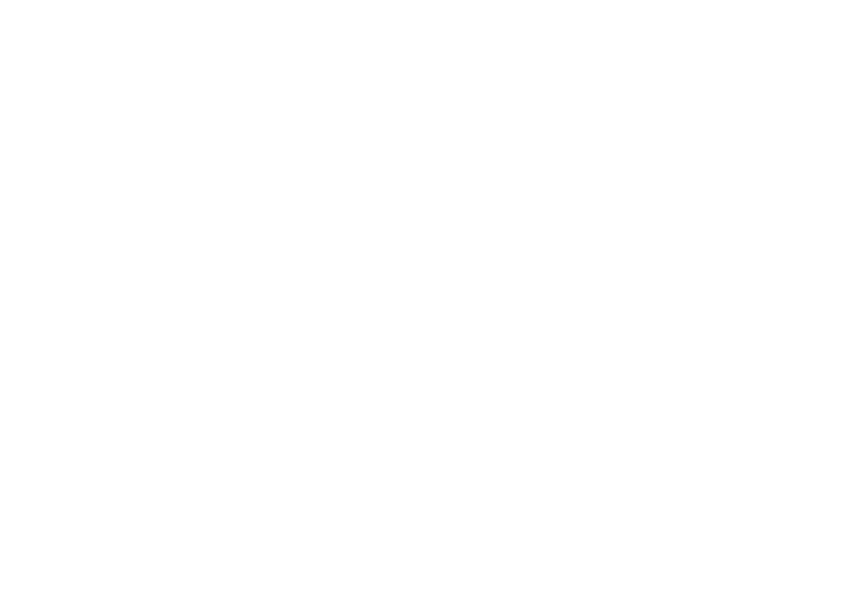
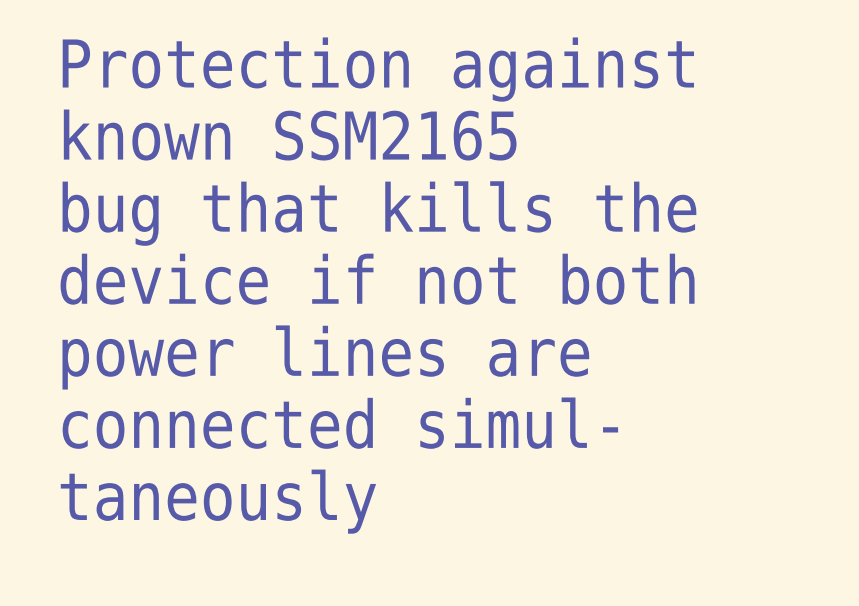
text: none -> Protection against (378, 69)
text: none -> known SSM2165 (290, 135)
text: none -> bug that kills the (379, 213)
text: none -> device if not both (377, 279)
text: none -> power lines are (325, 357)
text: none -> connected simul- (340, 423)
text: none -> taneously (218, 501)

